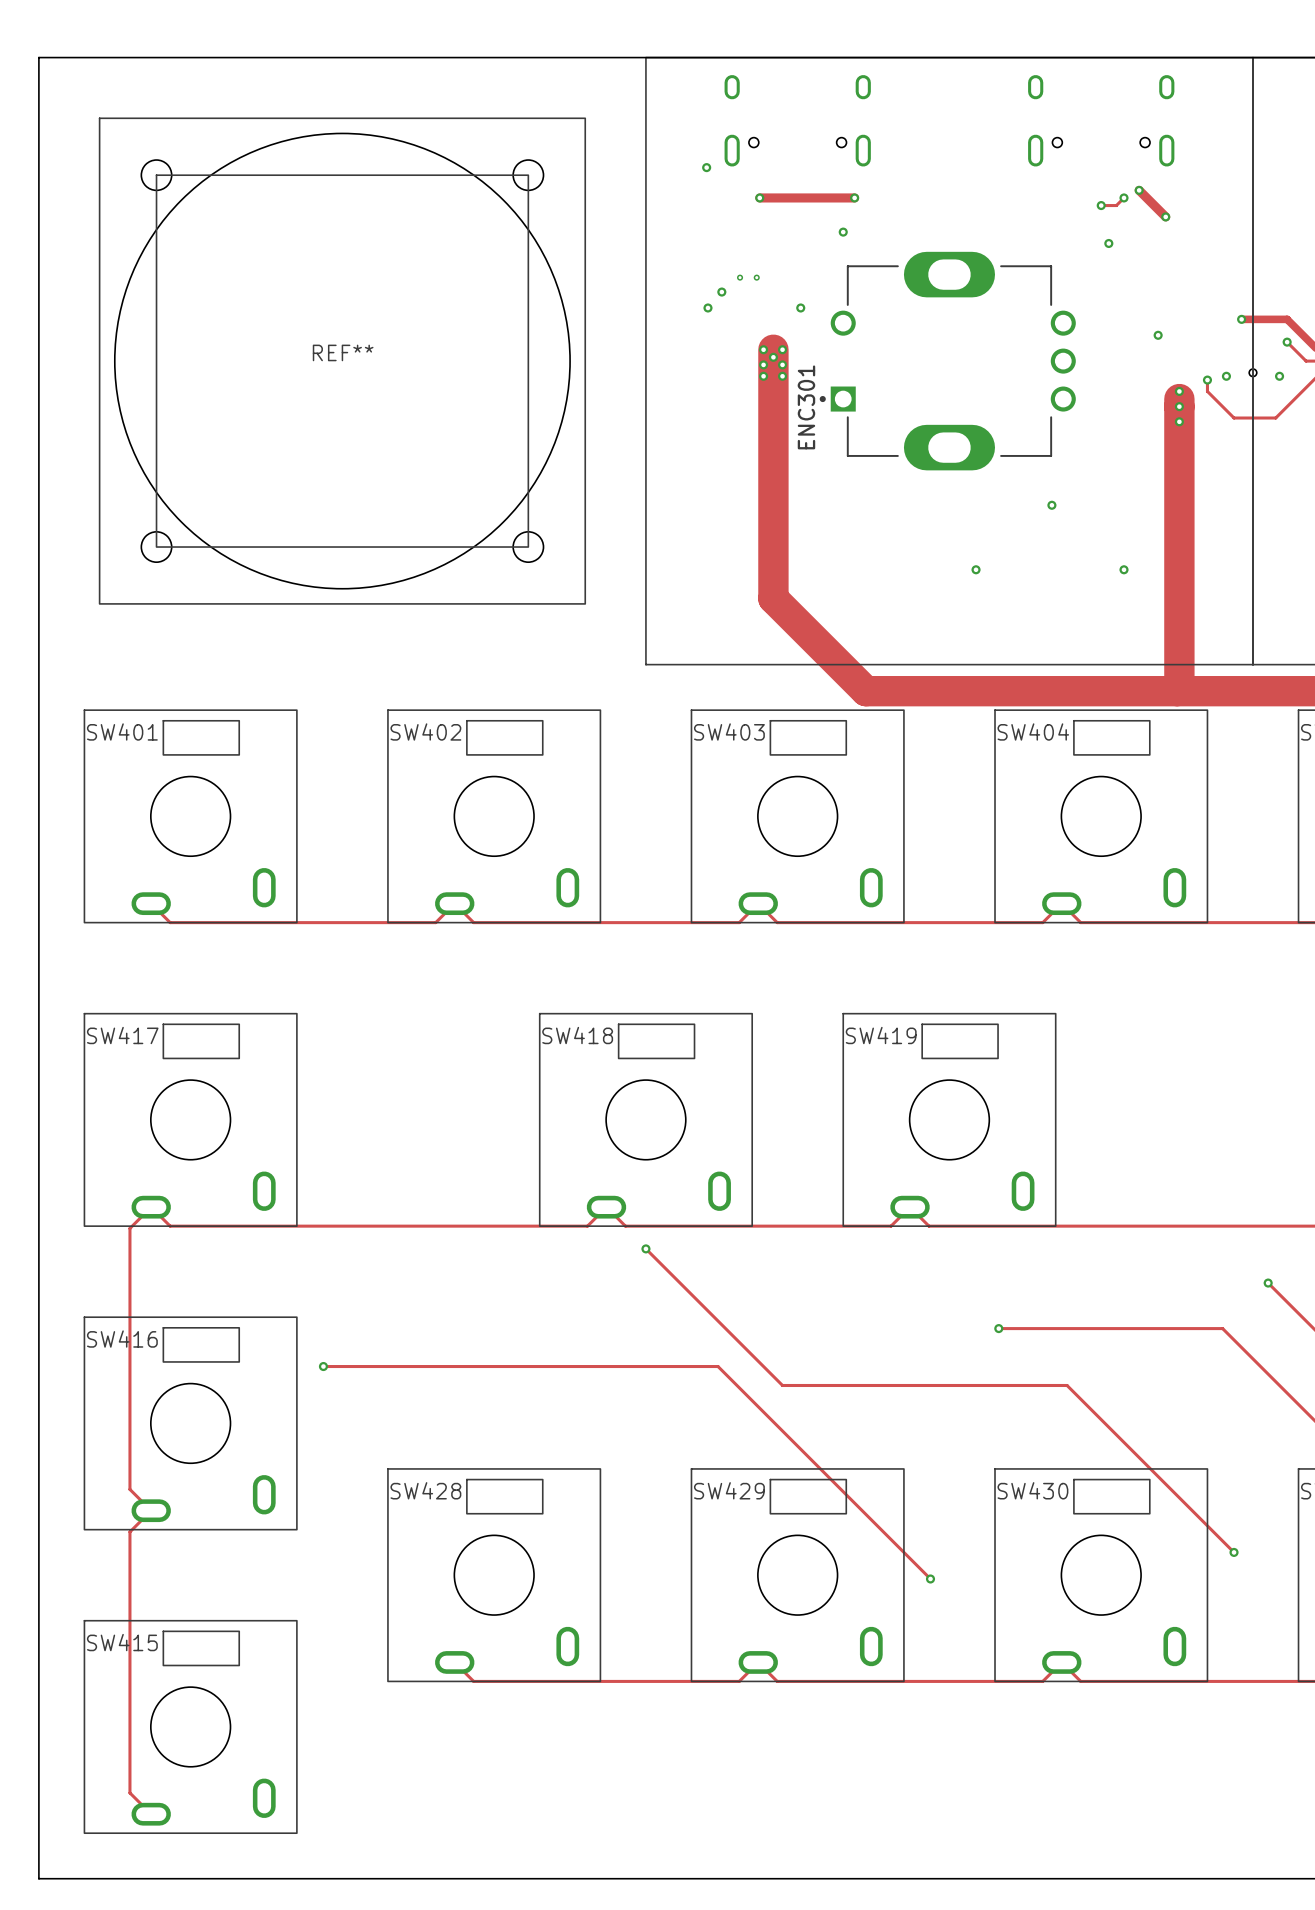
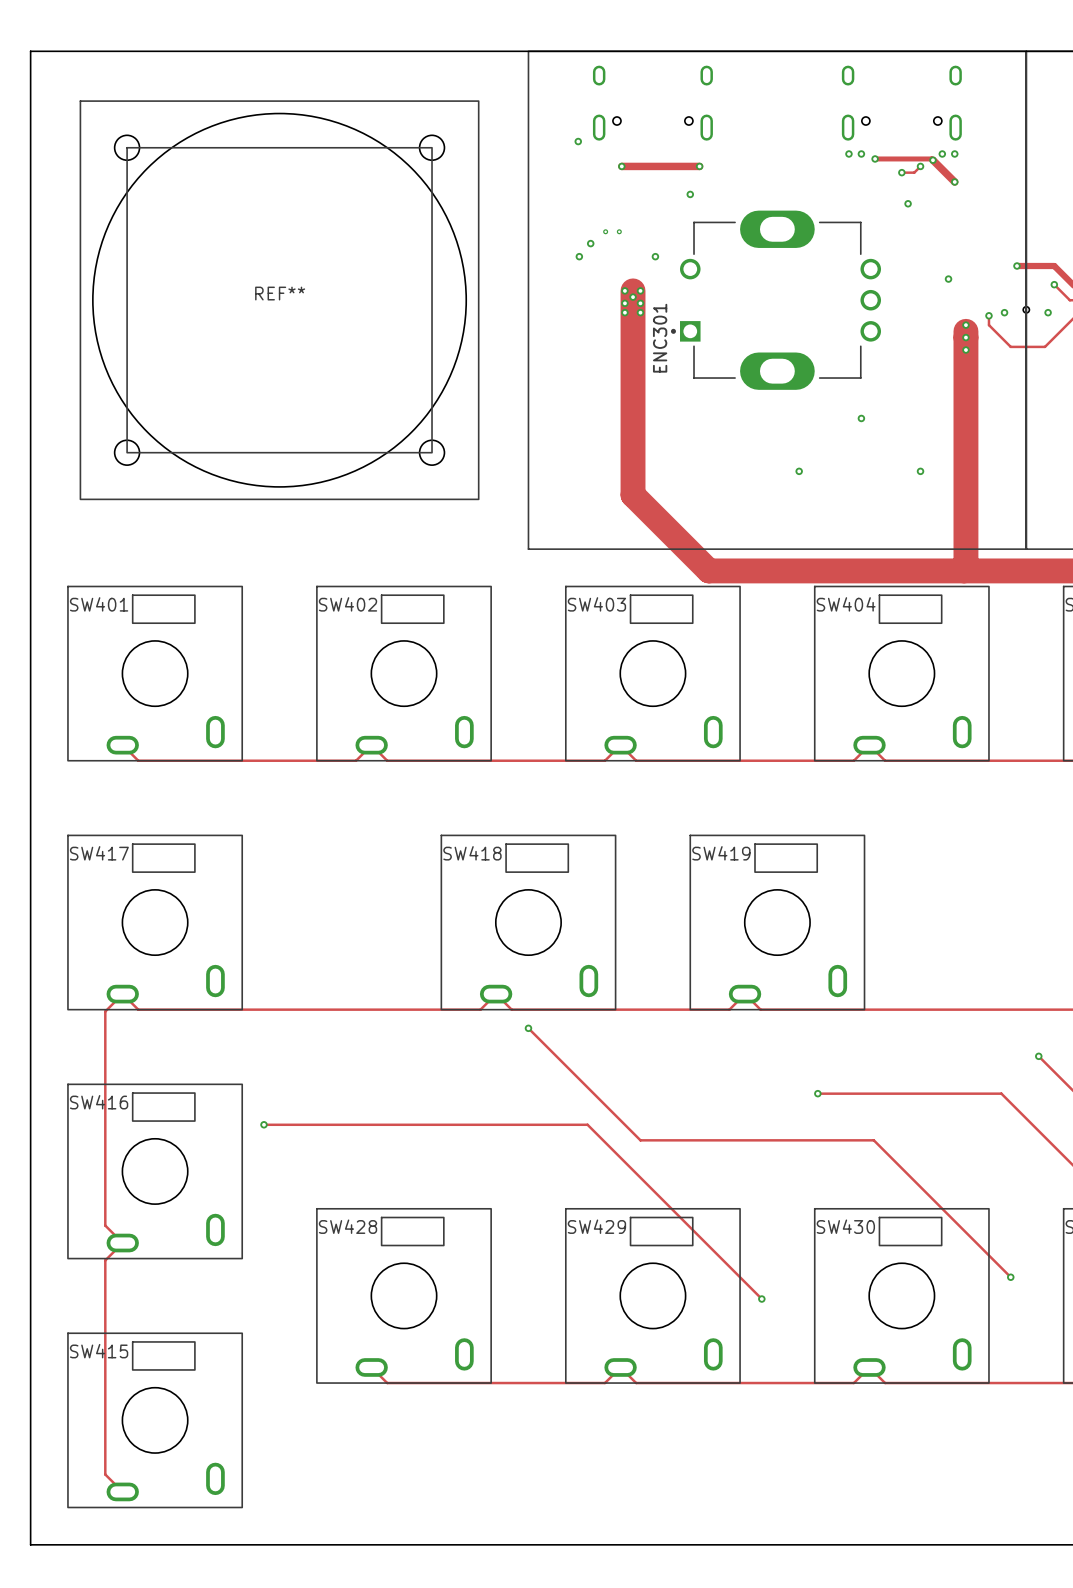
via: none -> (848, 153)
via: none -> (861, 153)
via: none -> (942, 153)
via: none -> (954, 153)
track: none -> (875, 158) (932, 160)
via: none -> (875, 158)

